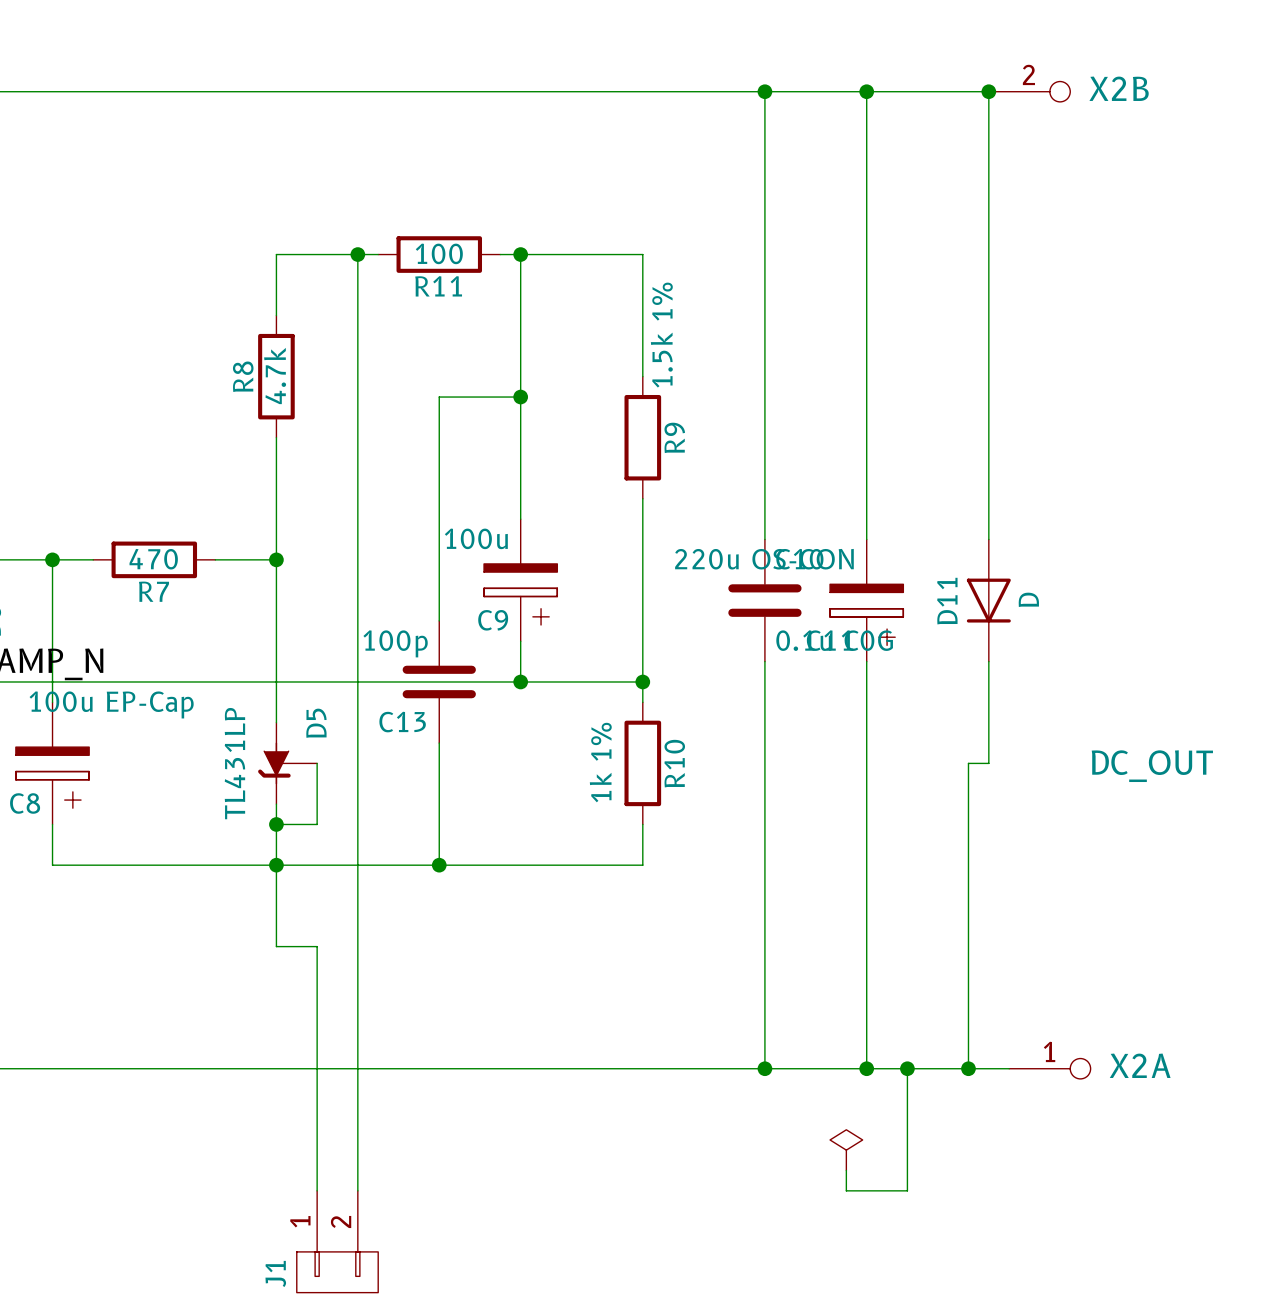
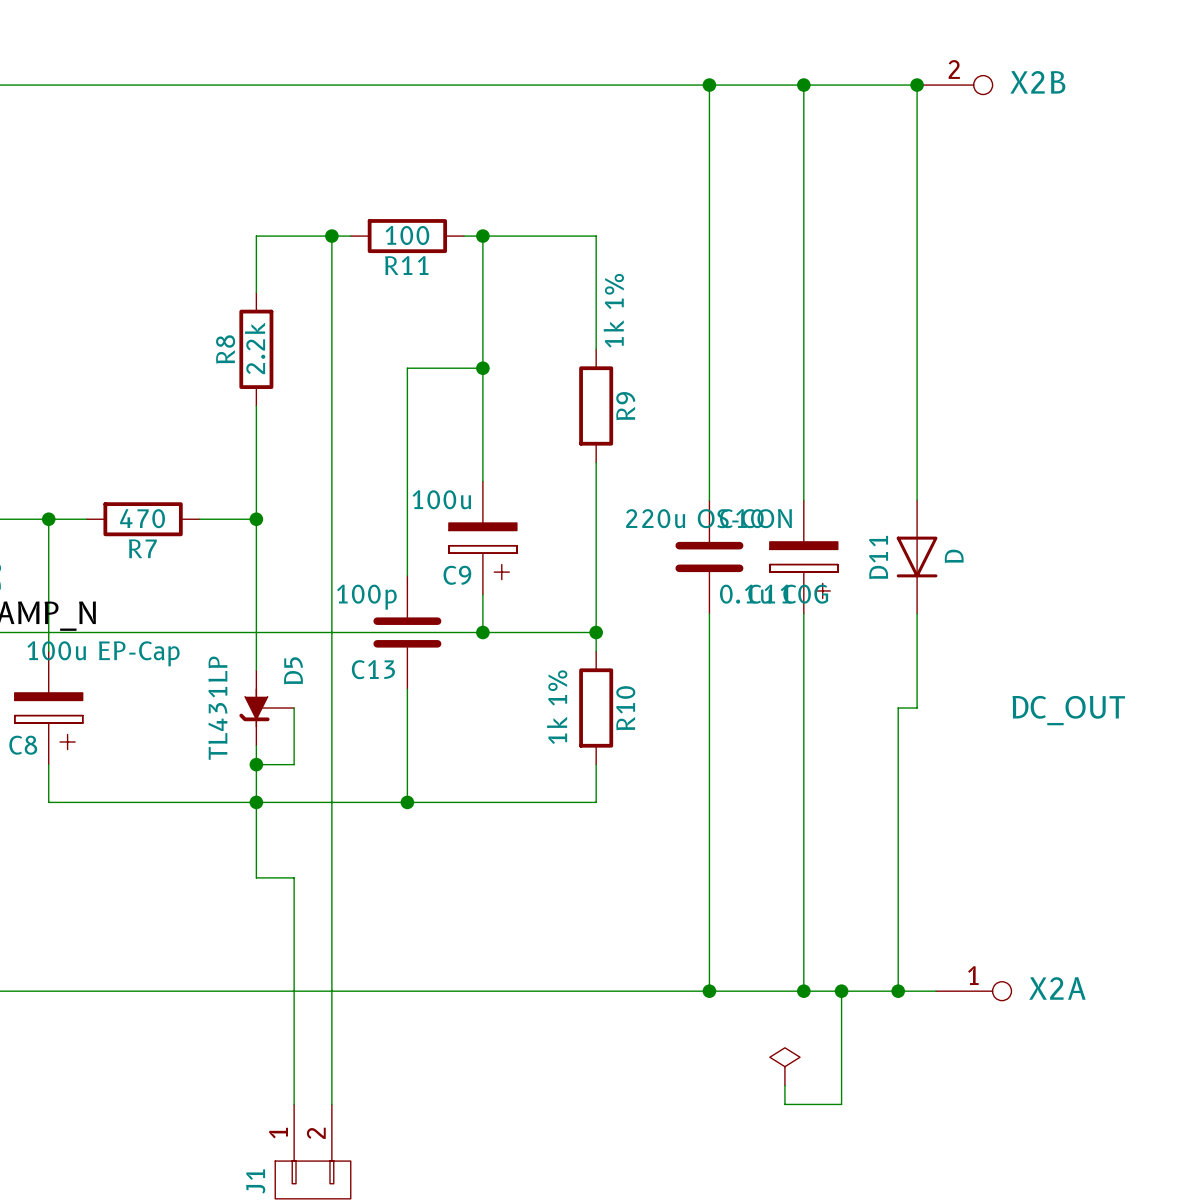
R9 value: 1.5k 1% (661, 335) -> 1k 1% (613, 310)
R8 value: 4.7k (275, 376) -> 2.2k (255, 348)

